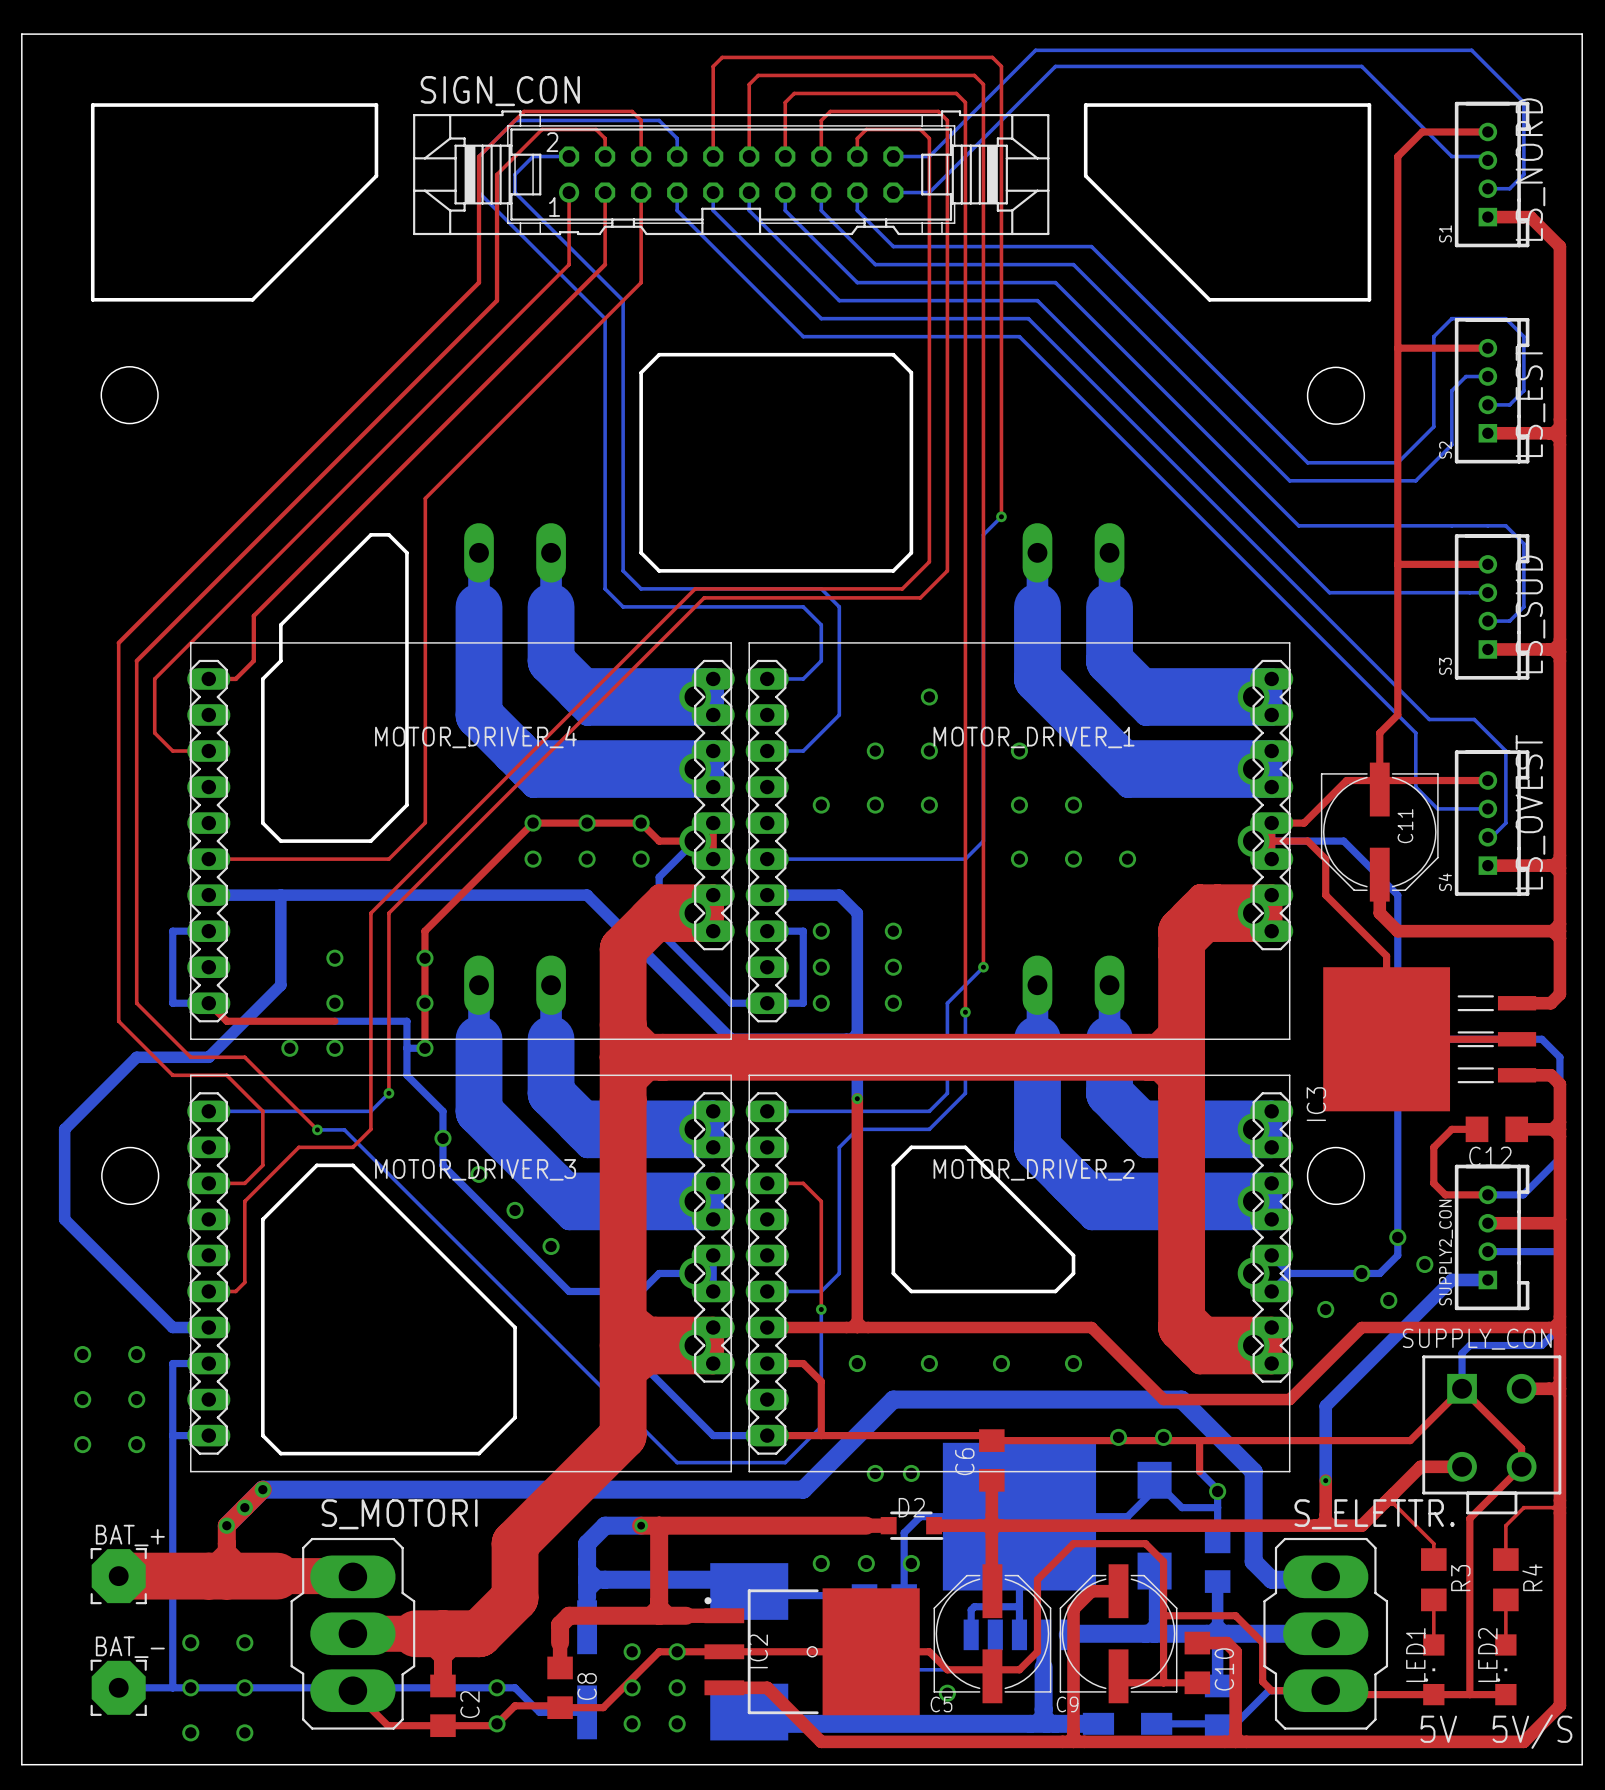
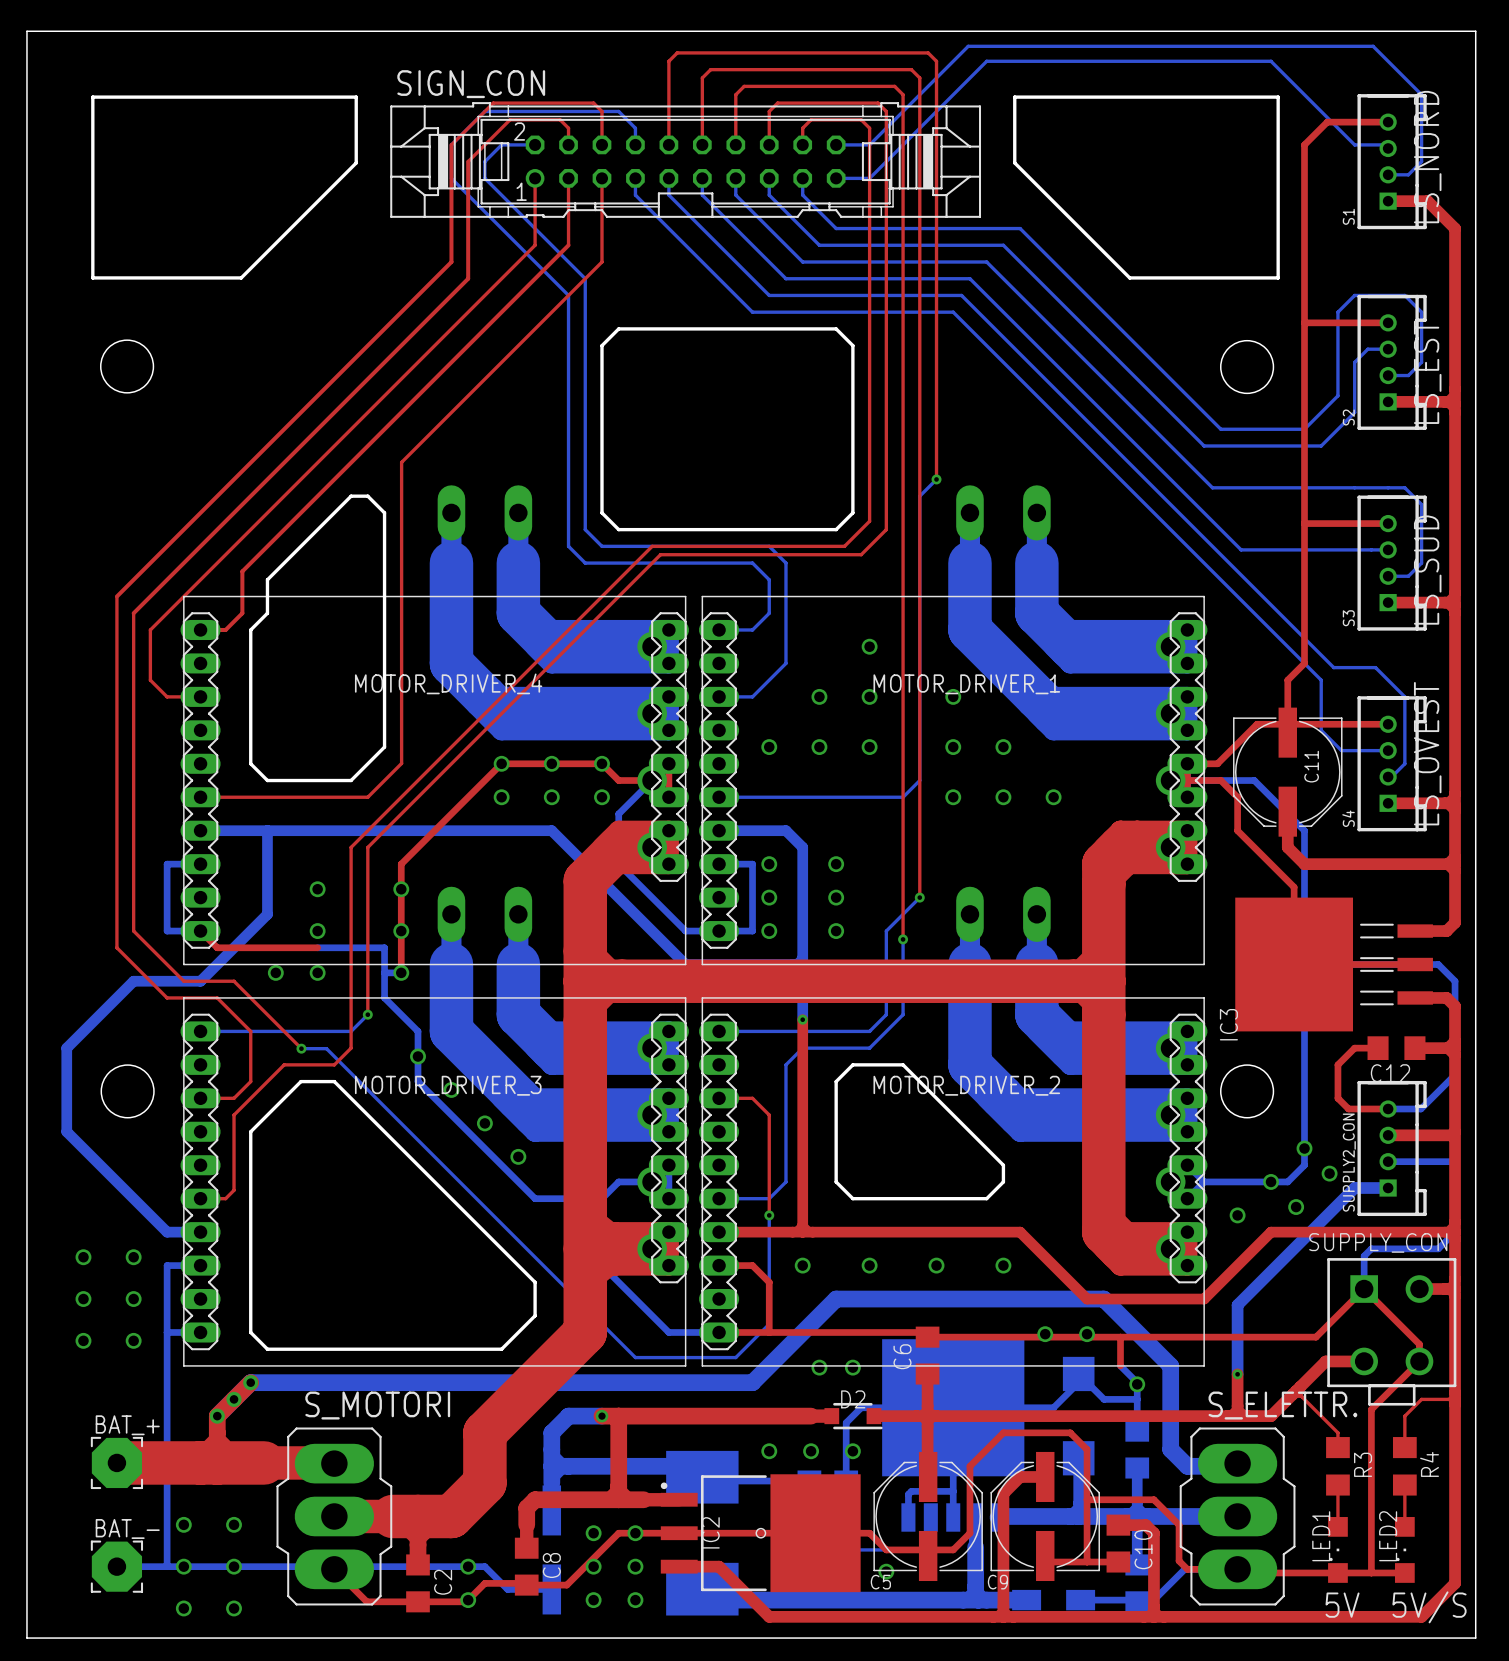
board edge: (515, 1327) (515, 1417) (479, 1453) -> (484, 1232) (535, 1282) (535, 1315) (501, 1349) (451, 1349)

